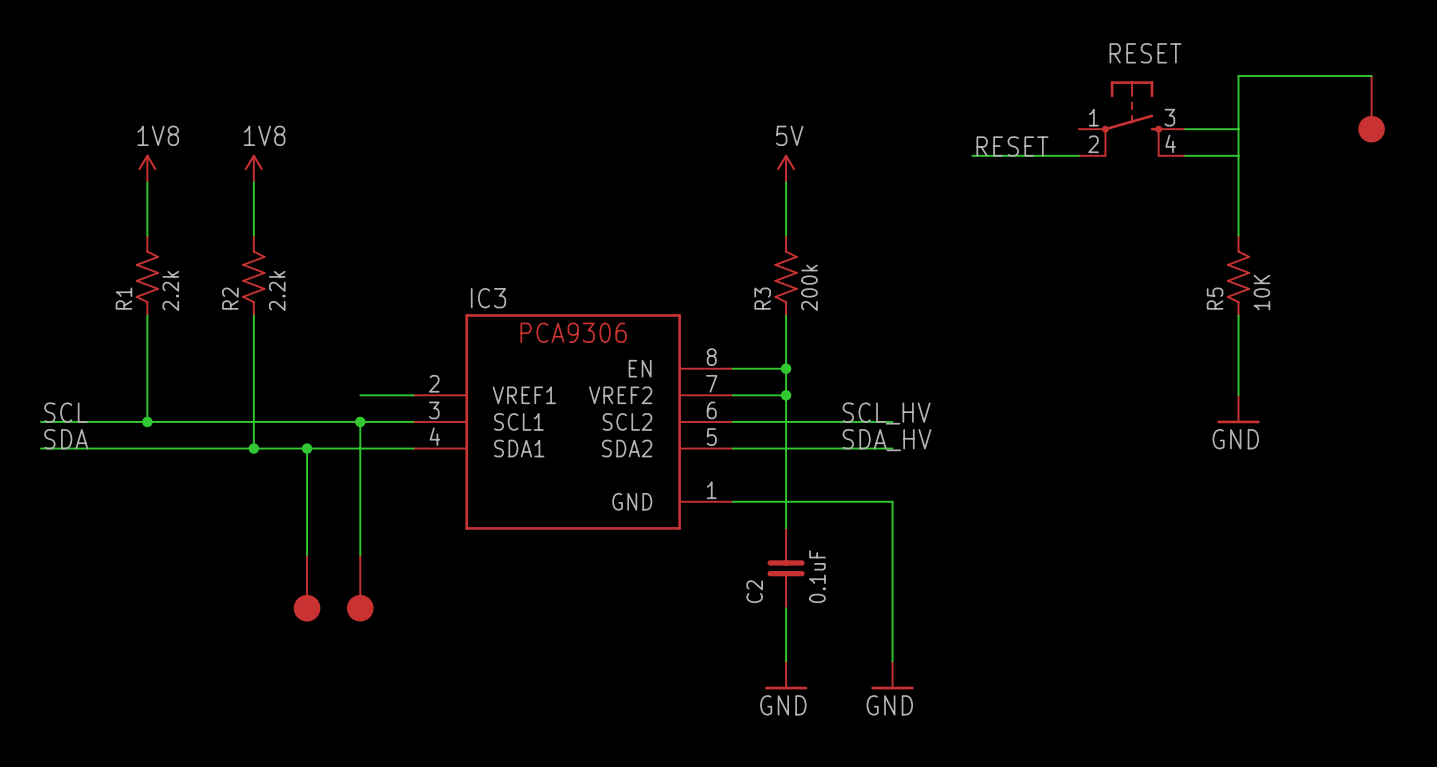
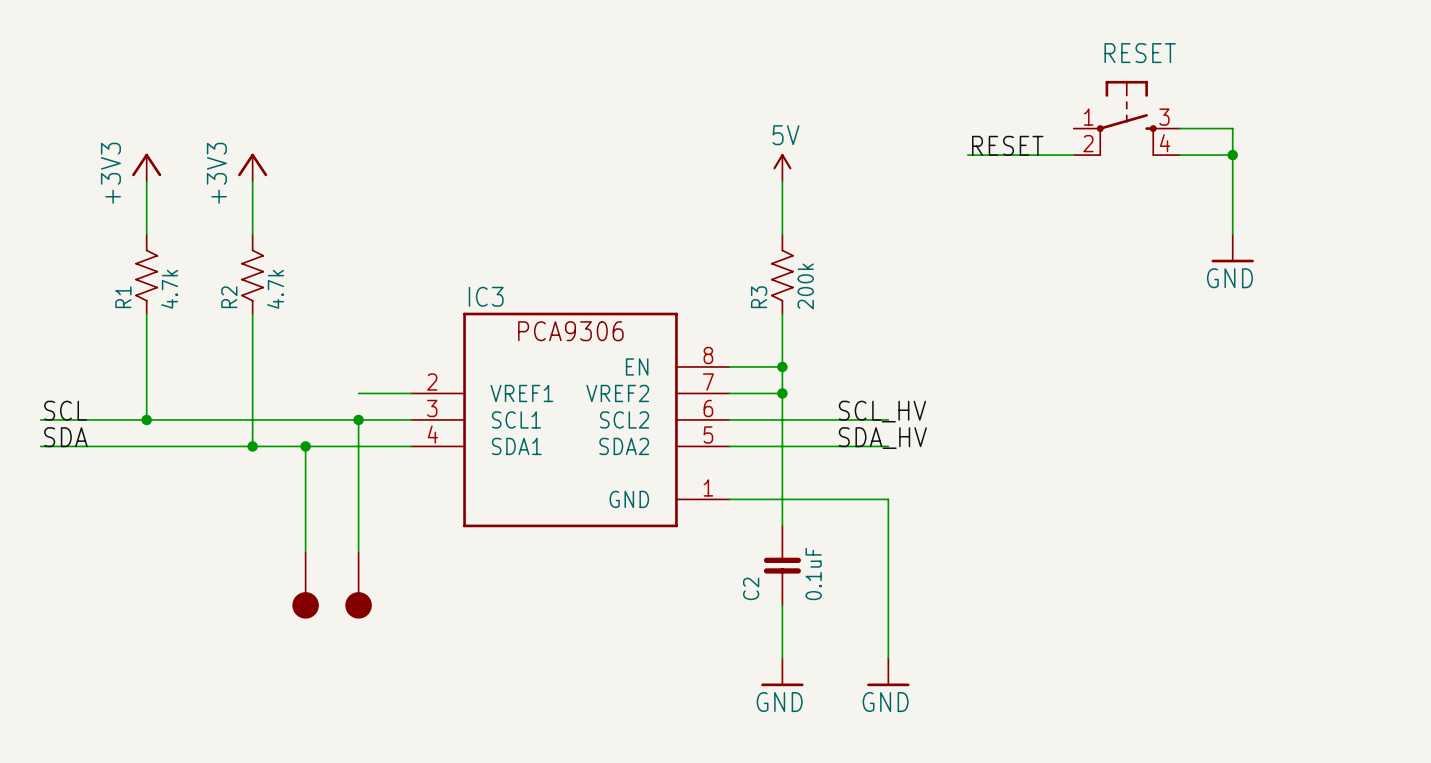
wire: (1371, 75) (1238, 75) (1238, 129) -> none
part: (1371, 109) -> none
junction: none -> (1232, 155)
power symbol: 1V8 (147, 168) -> +3V3 (146, 167)
power symbol: 1V8 (253, 168) -> +3V3 (252, 167)
R5: 10K (1238, 275) -> none
R1 value: 2.2k (170, 290) -> 4.7k (169, 289)
R2 value: 2.2k (277, 290) -> 4.7k (275, 289)
wire: (1238, 315) (1238, 395) -> none
power symbol position: GND (1238, 409) -> GND (1232, 248)

